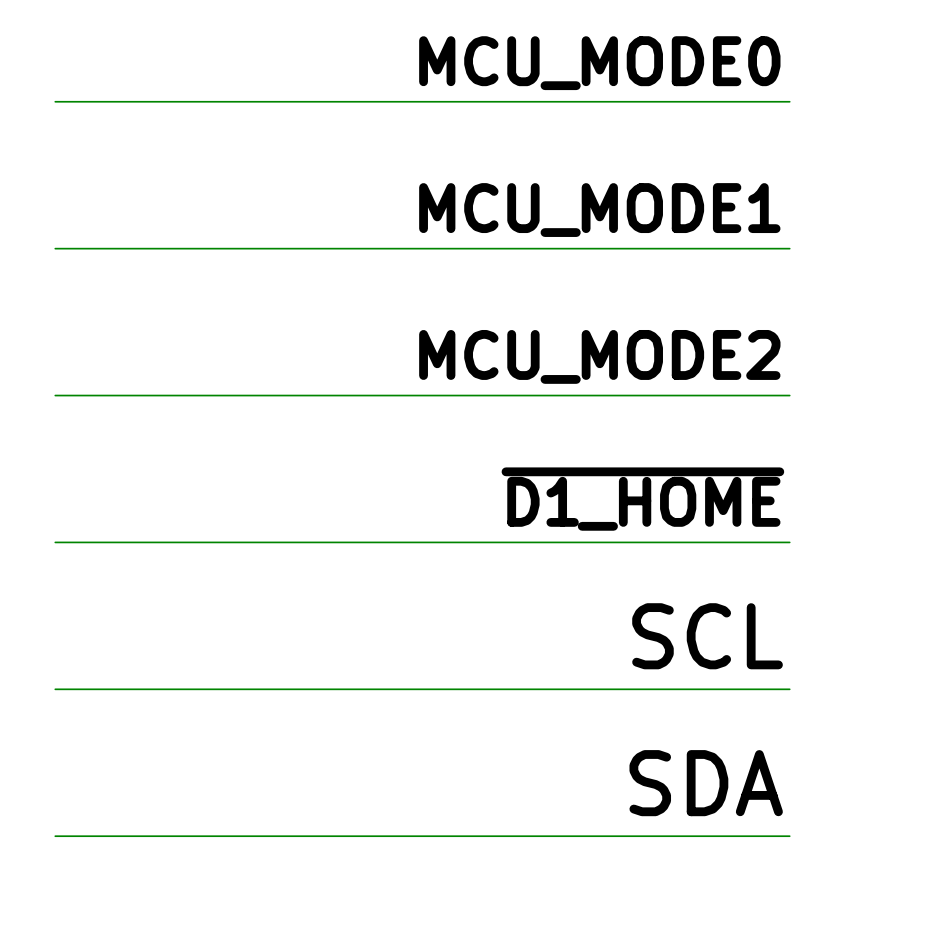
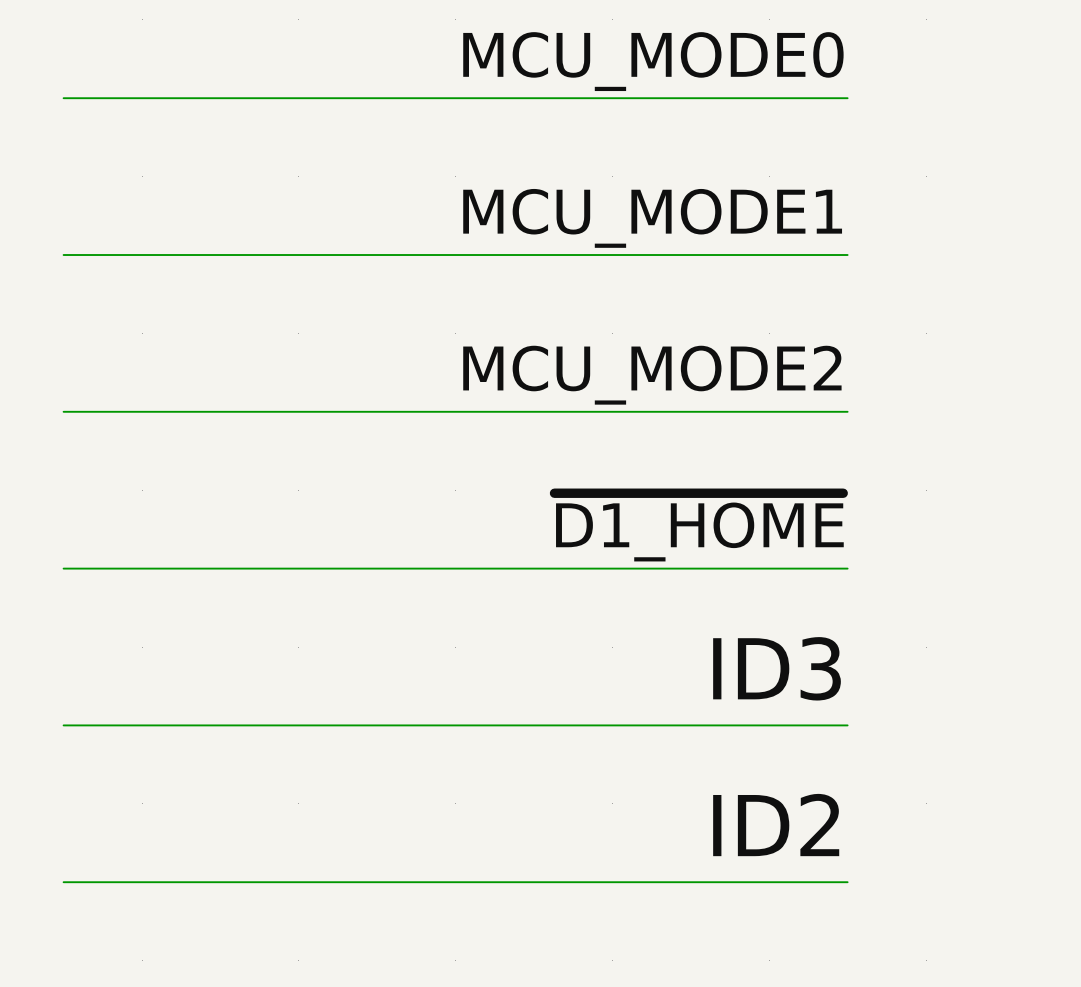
label: SCL (707, 636) -> ID3 (777, 668)
label: SDA (706, 783) -> ID2 (776, 825)

